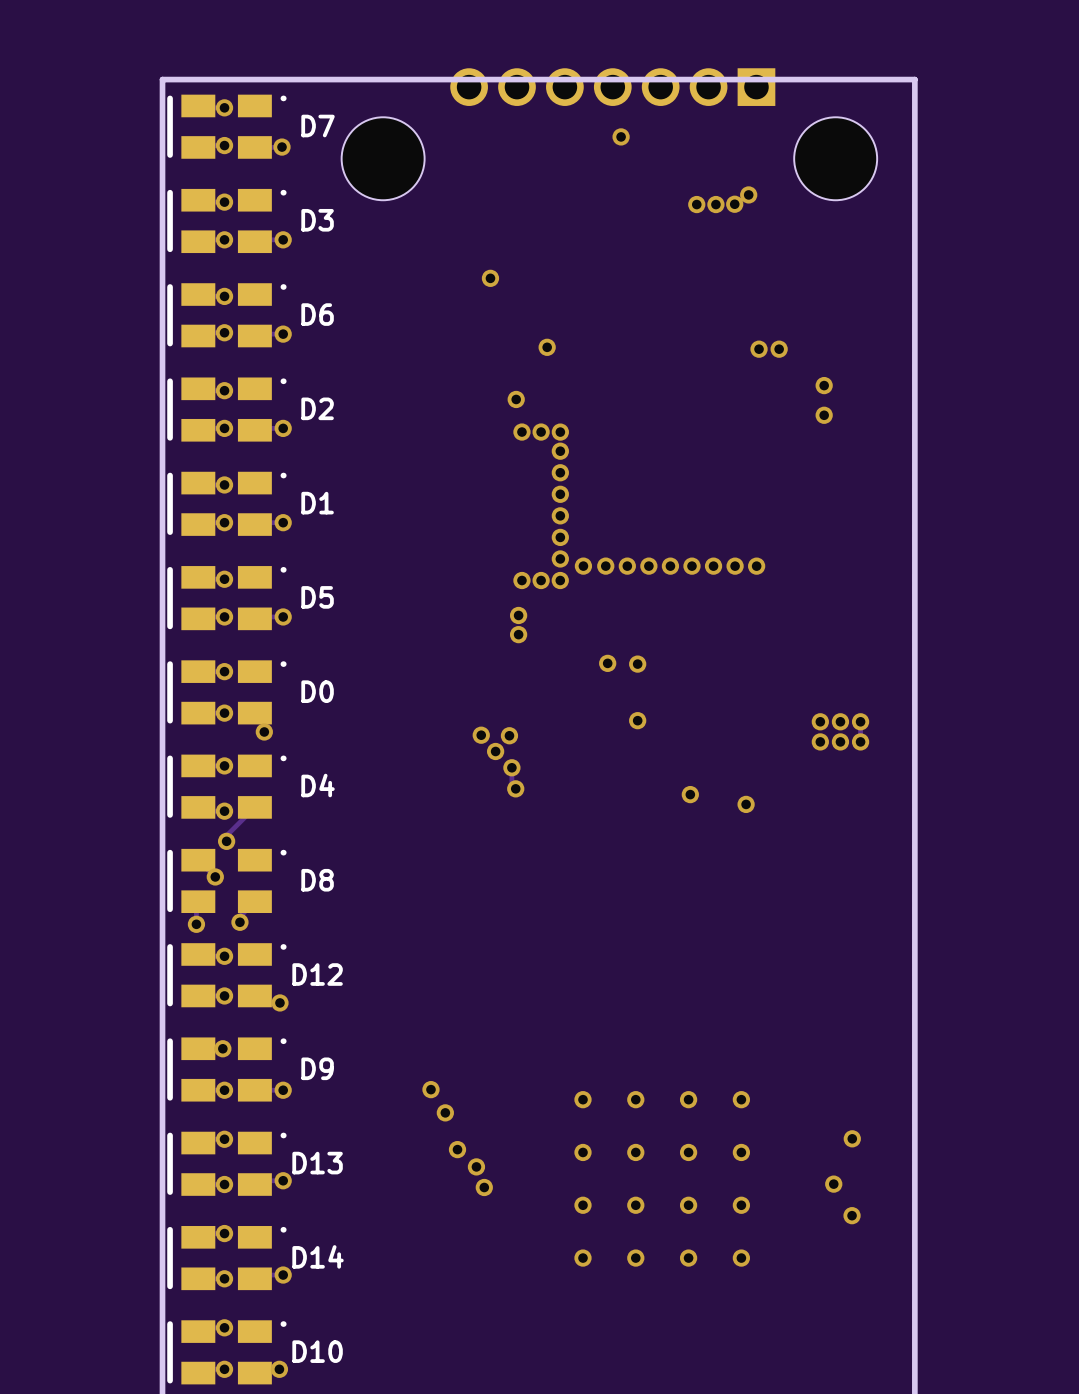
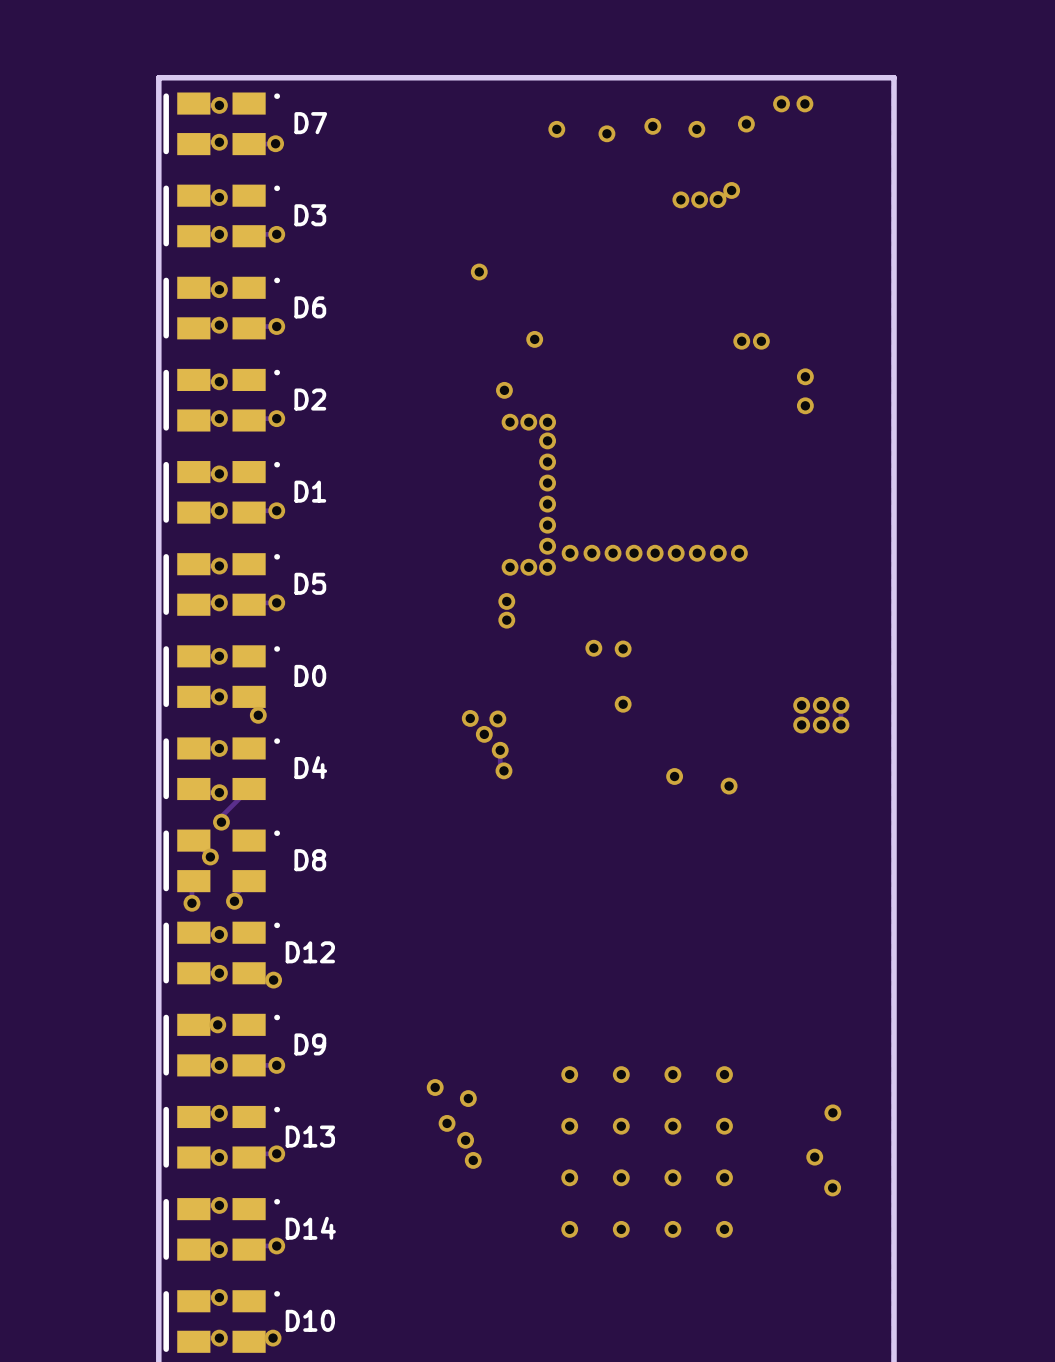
part: (612, 87) -> none
via: none -> (781, 103)
via: none -> (804, 103)
via: none -> (746, 124)
via: none -> (652, 126)
via: none -> (556, 129)
via: none -> (696, 129)
part: (383, 158) -> none
part: (835, 158) -> none
via position: (430, 1089) -> (468, 1098)

